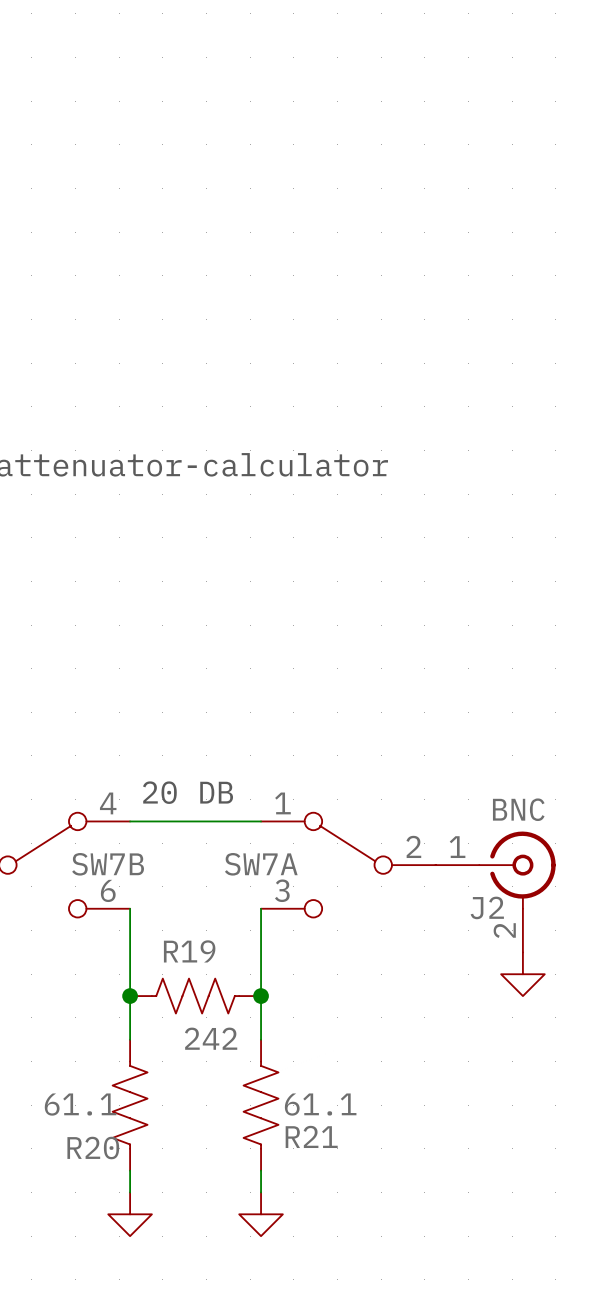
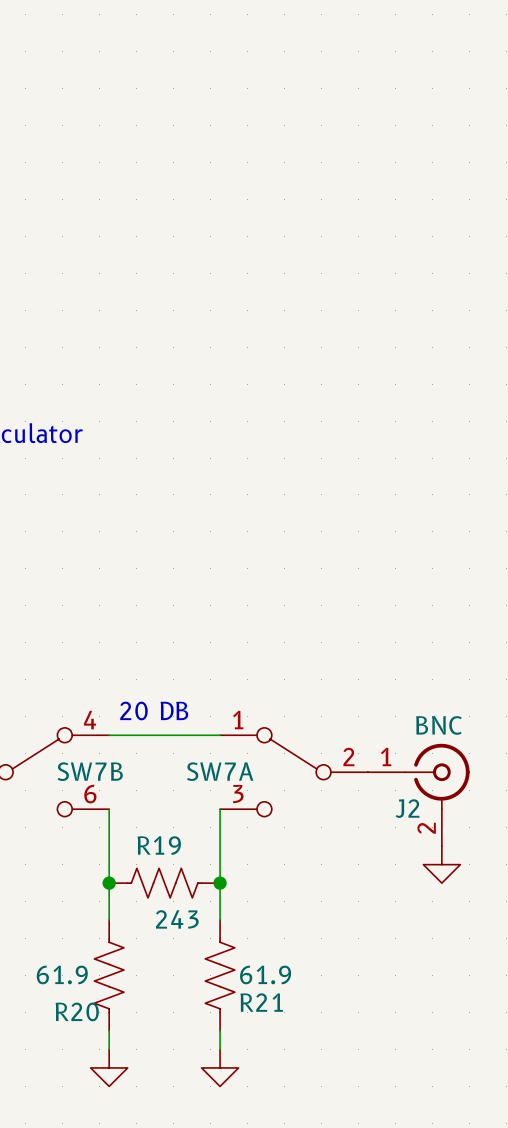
R19 value: 242 (211, 1038) -> 243 (177, 919)
R20 value: 61.1 (80, 1104) -> 61.9 (62, 974)
R21 value: 61.1 (320, 1104) -> 61.9 (265, 974)

